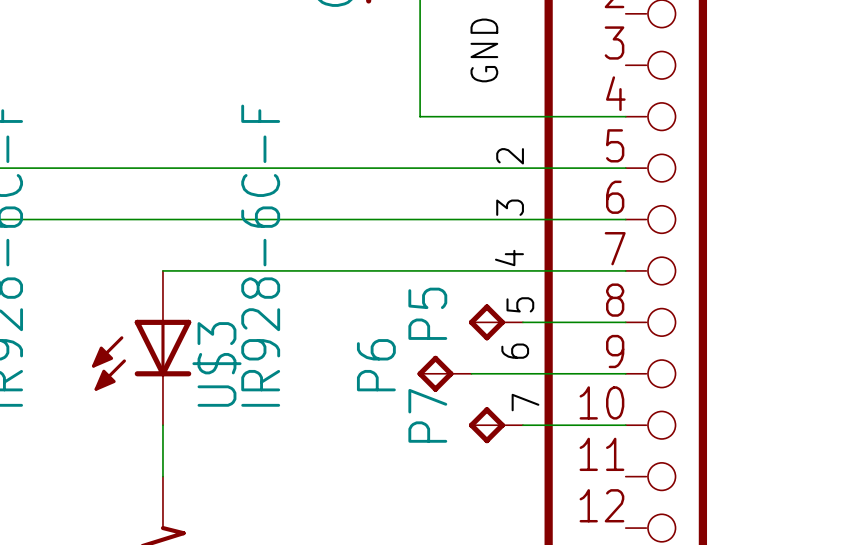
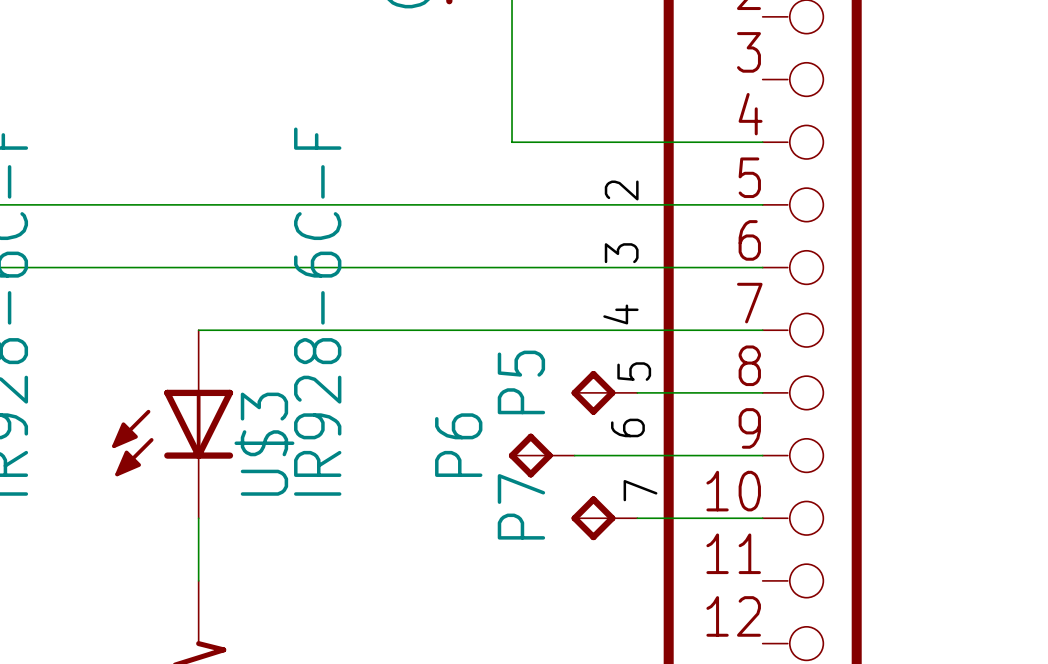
label: GND (484, 50) -> none

